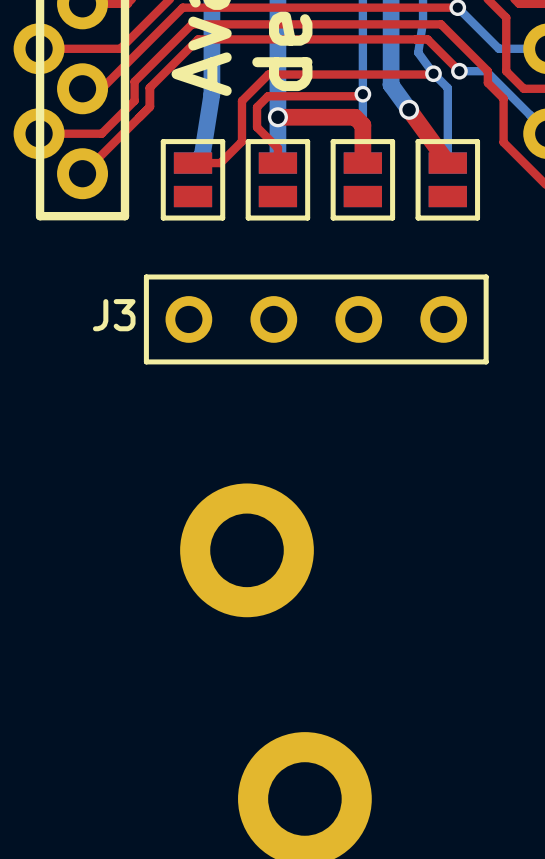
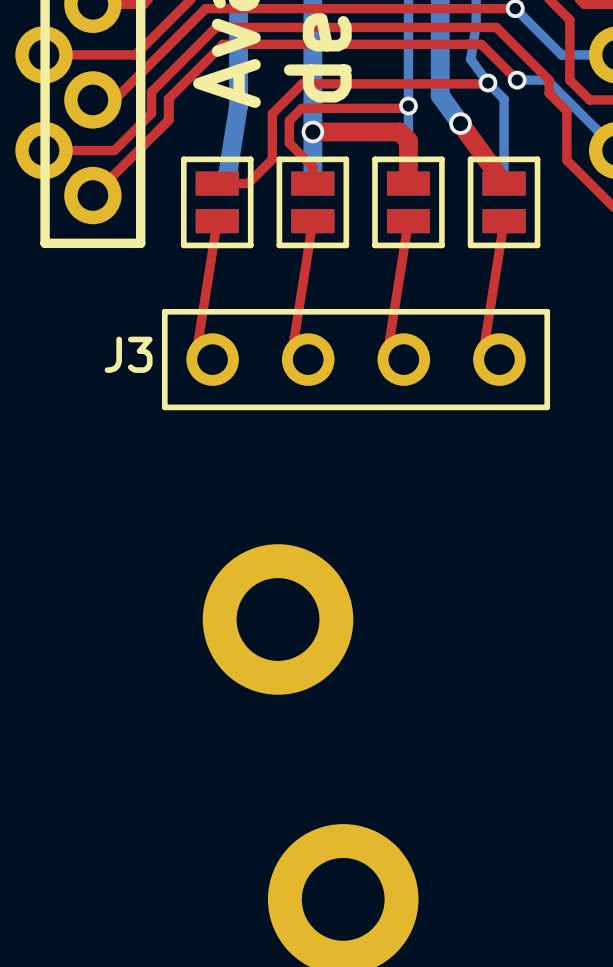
top track: none -> (217, 221) (195, 359)
top track: none -> (312, 221) (290, 359)
top track: none -> (408, 221) (386, 359)
top track: none -> (504, 221) (482, 359)

